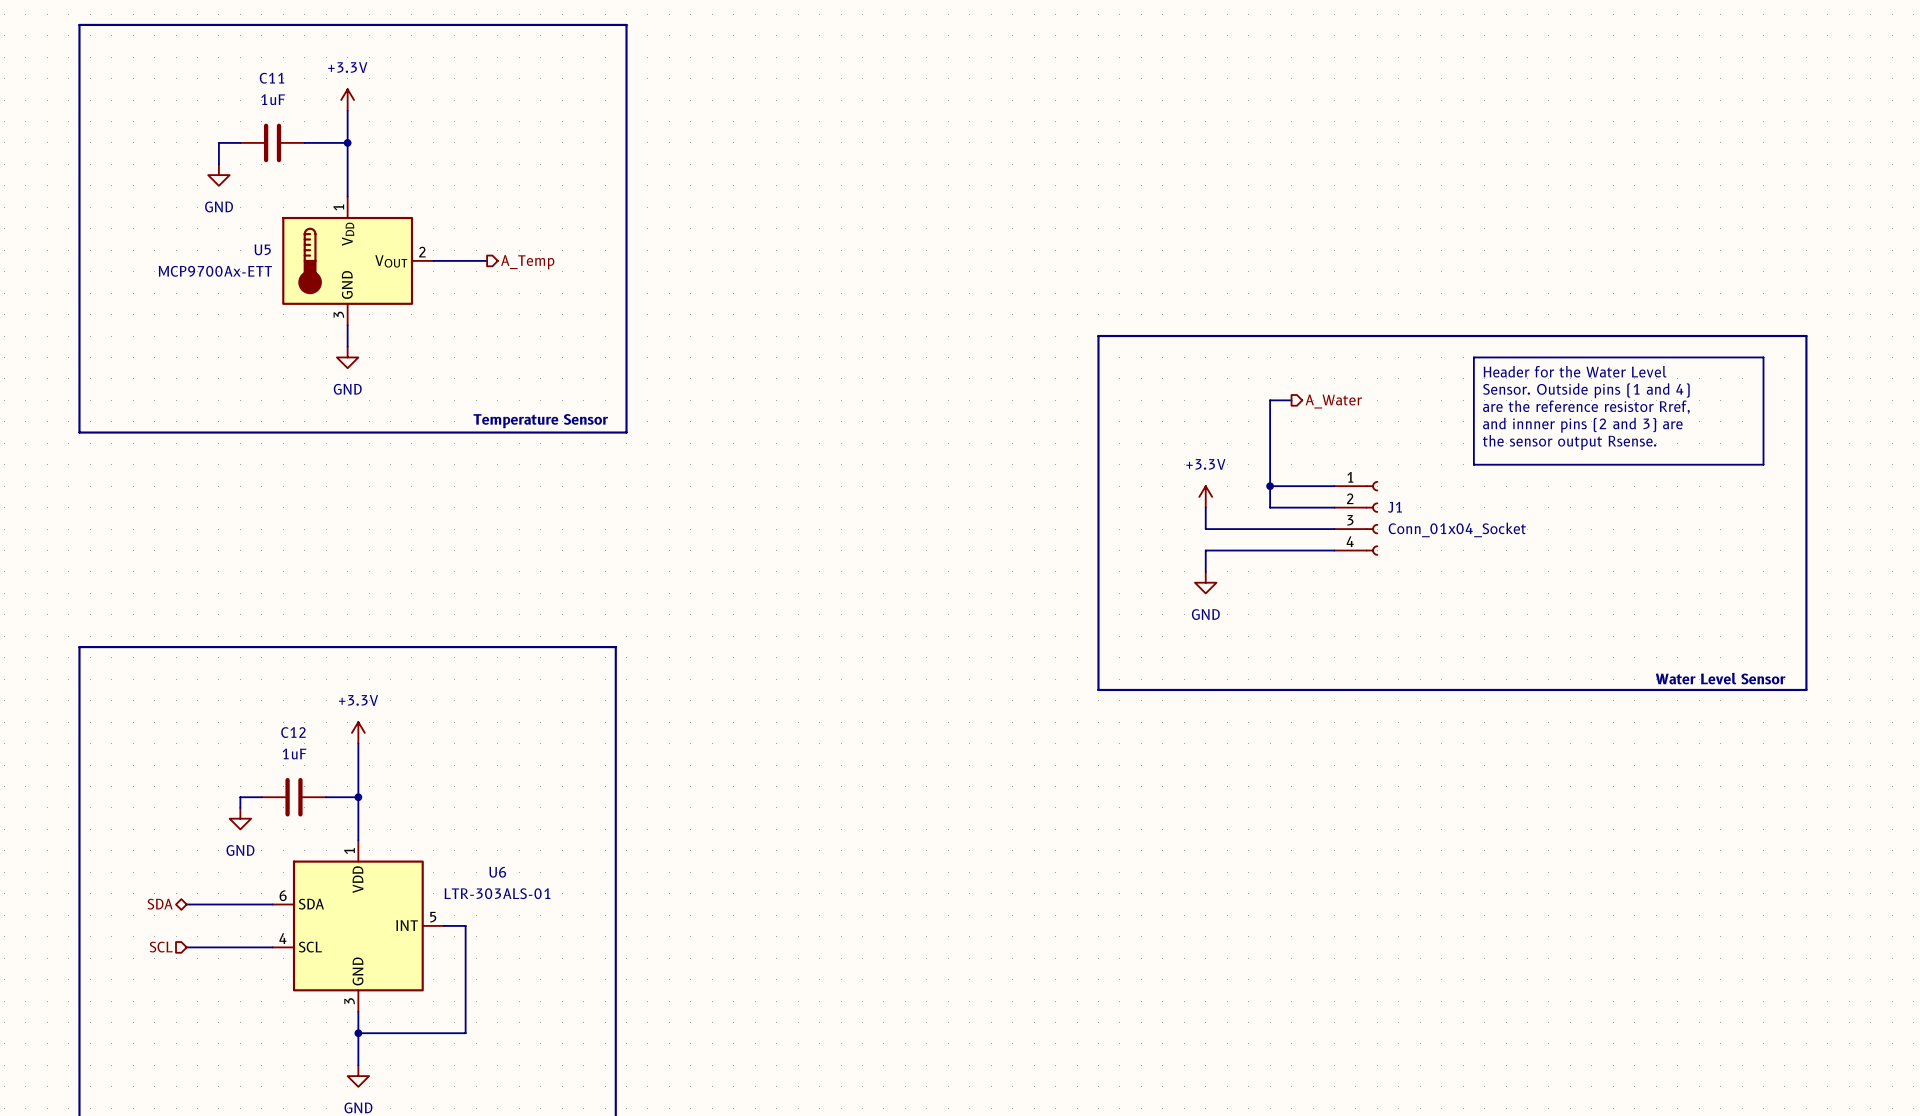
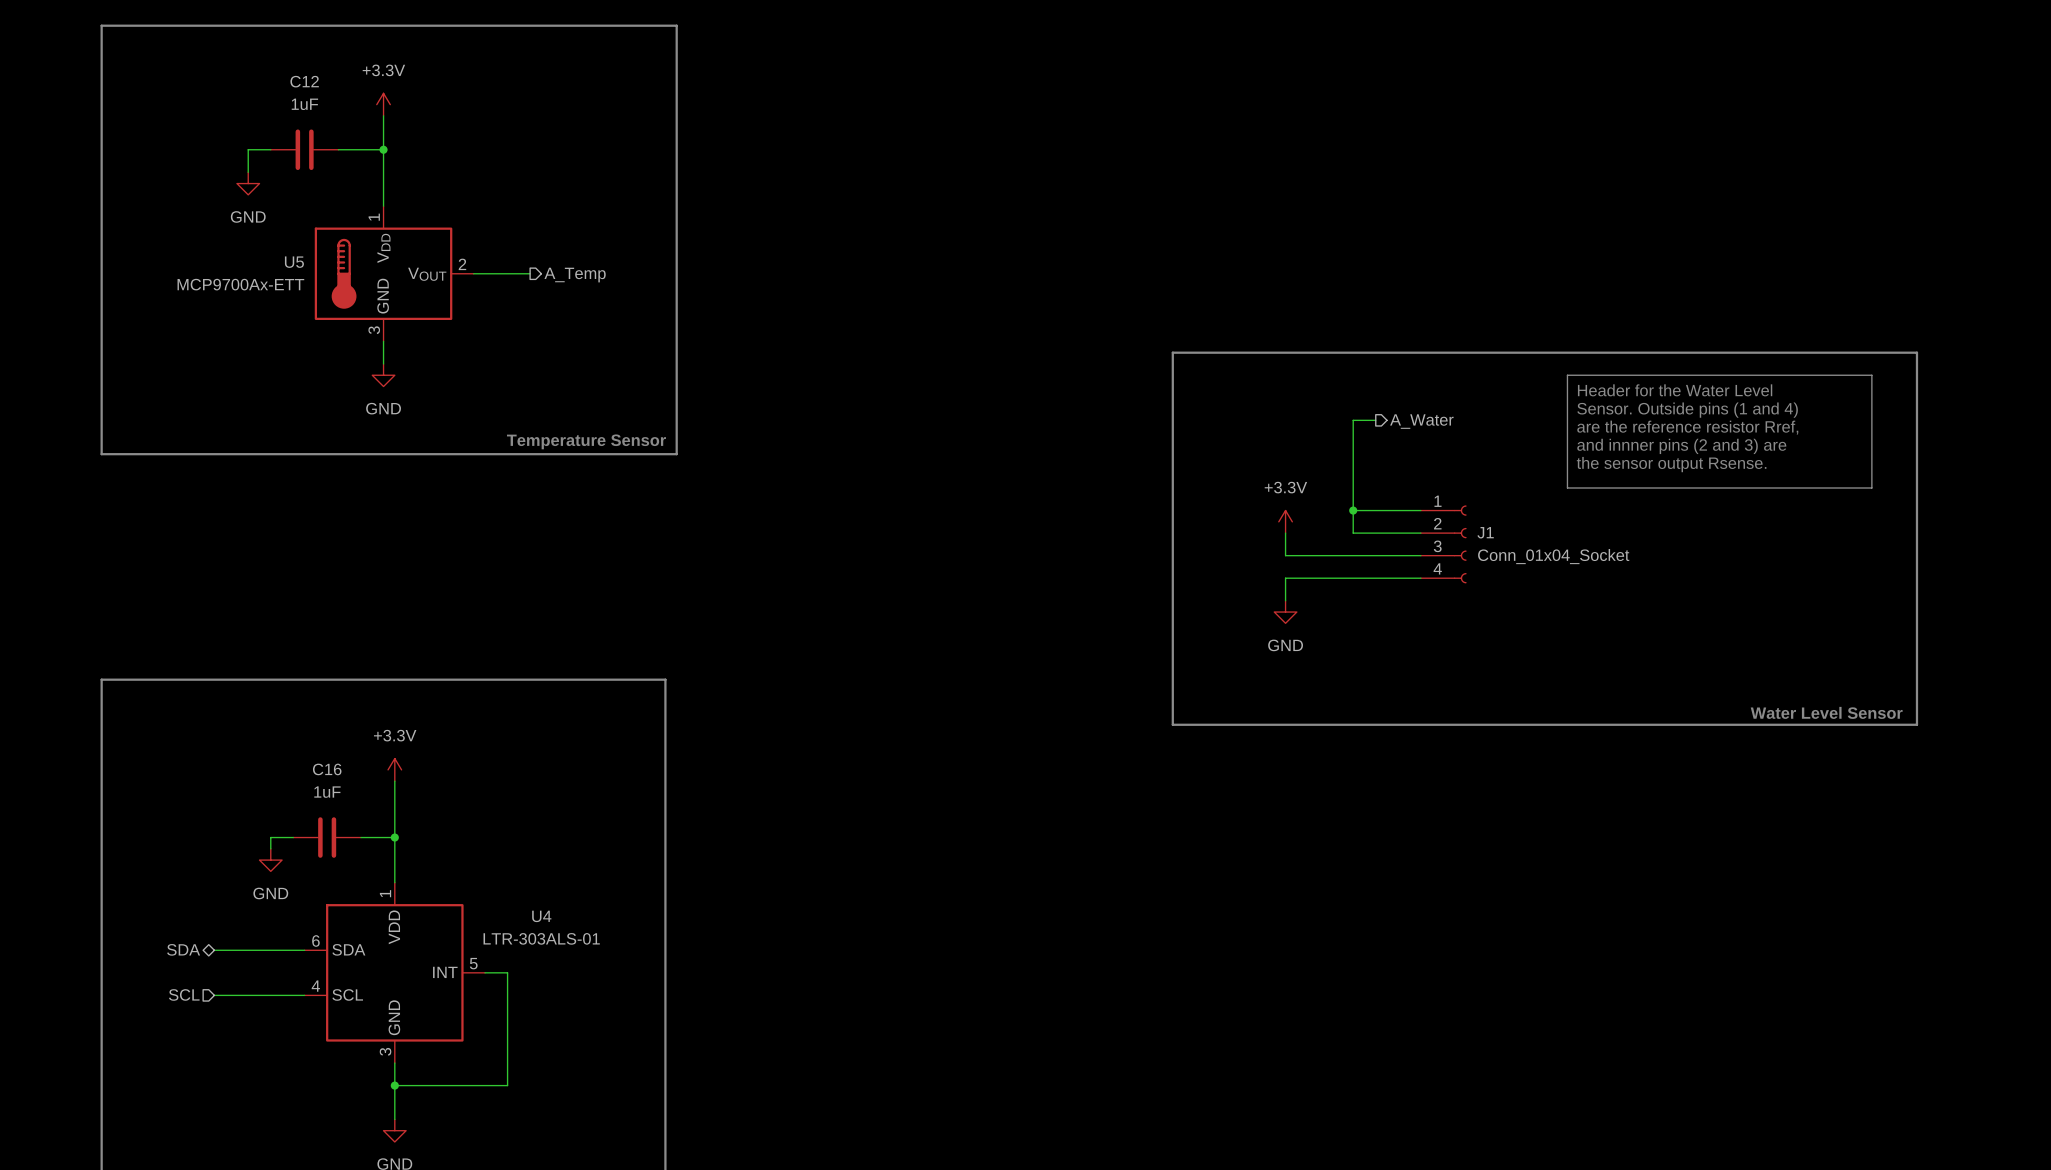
C11 name: C11 (271, 78) -> C12 (304, 81)
C12 name: C12 (293, 732) -> C16 (327, 769)
U6 name: U6 (497, 872) -> U4 (541, 916)

